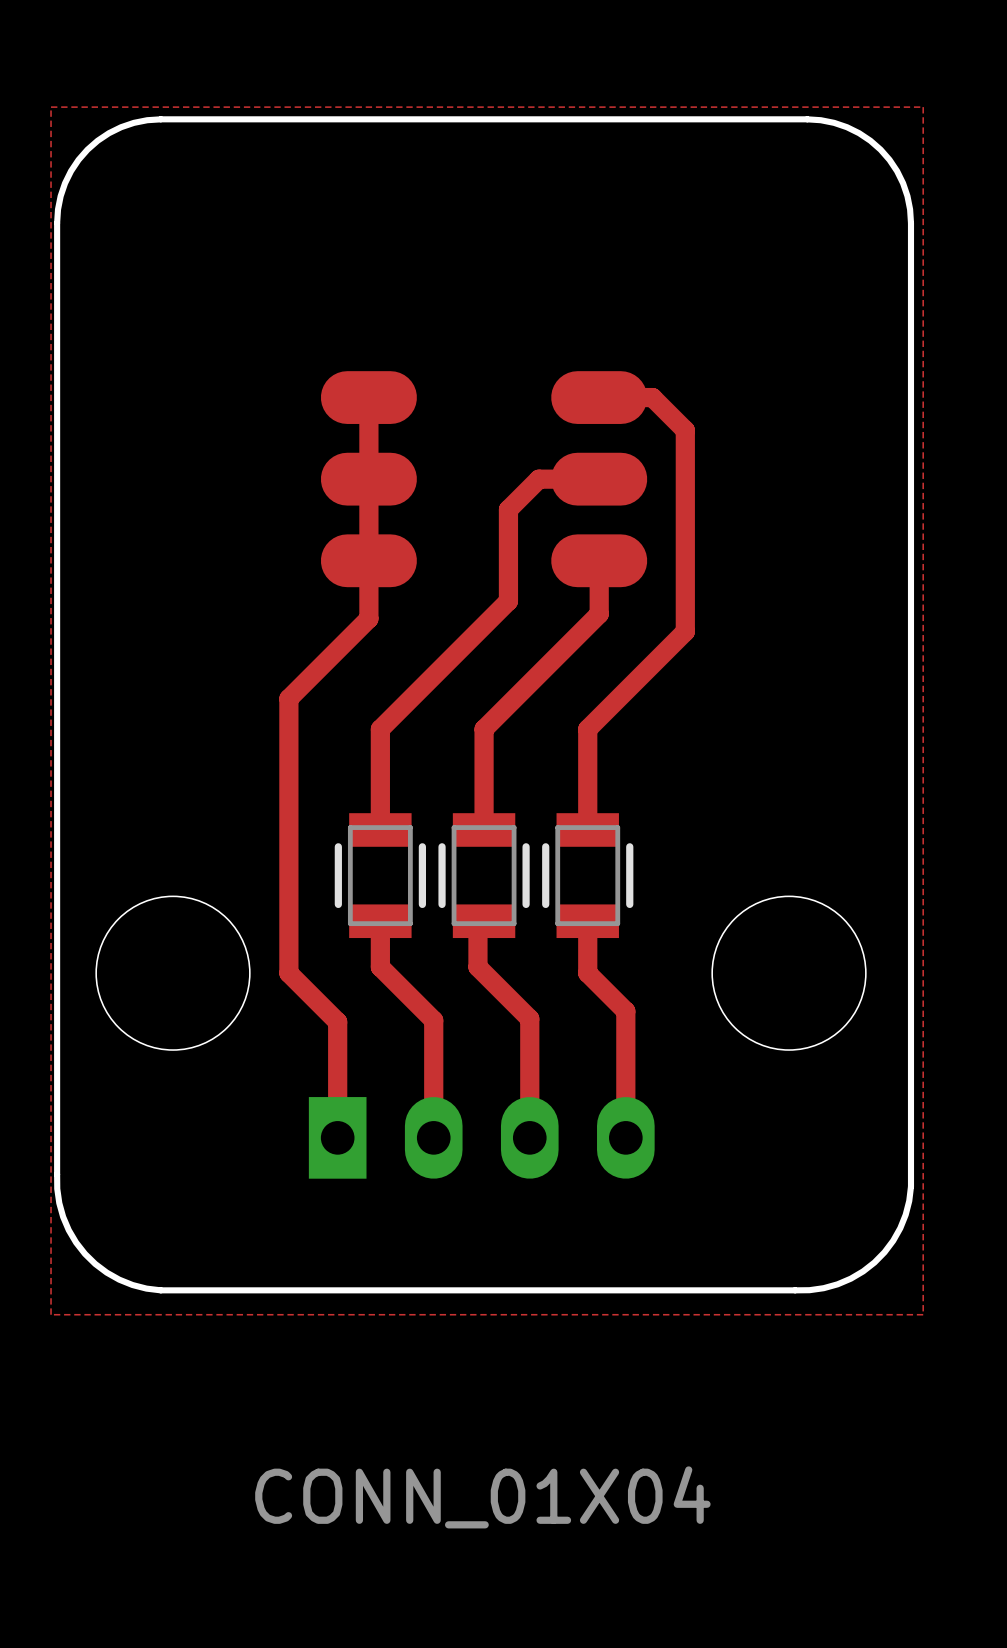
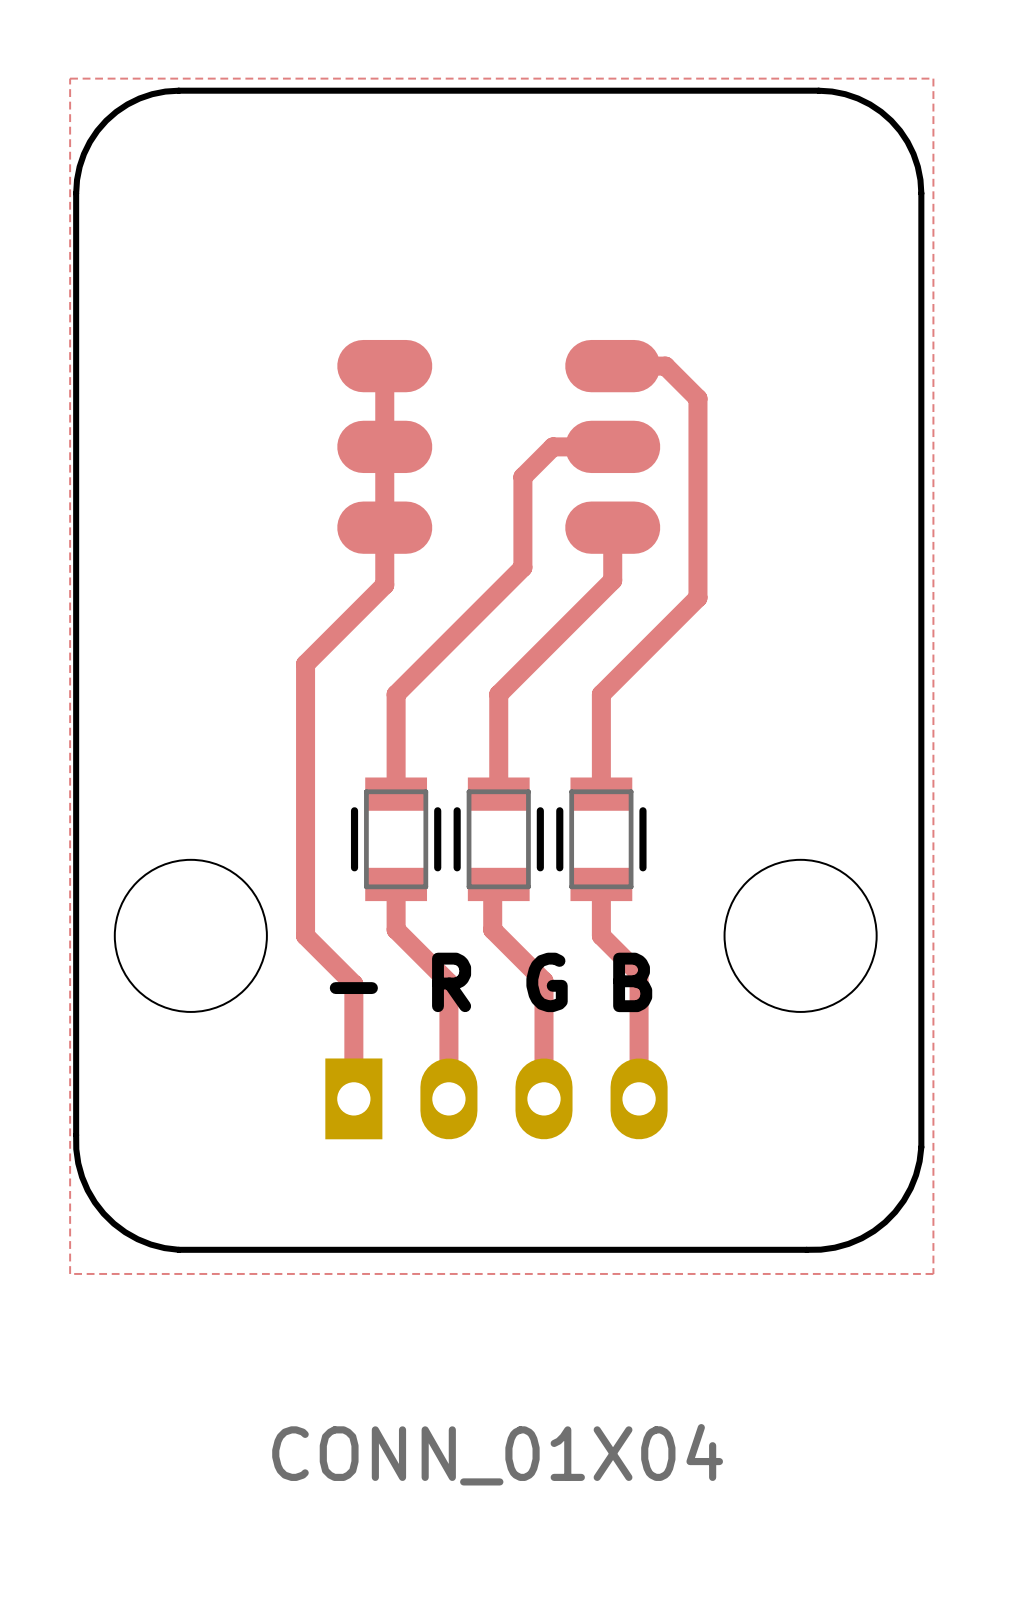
text: none -> R (451, 982)
text: none -> G (547, 982)
text: none -> B (632, 982)
text: none -> - (353, 988)

